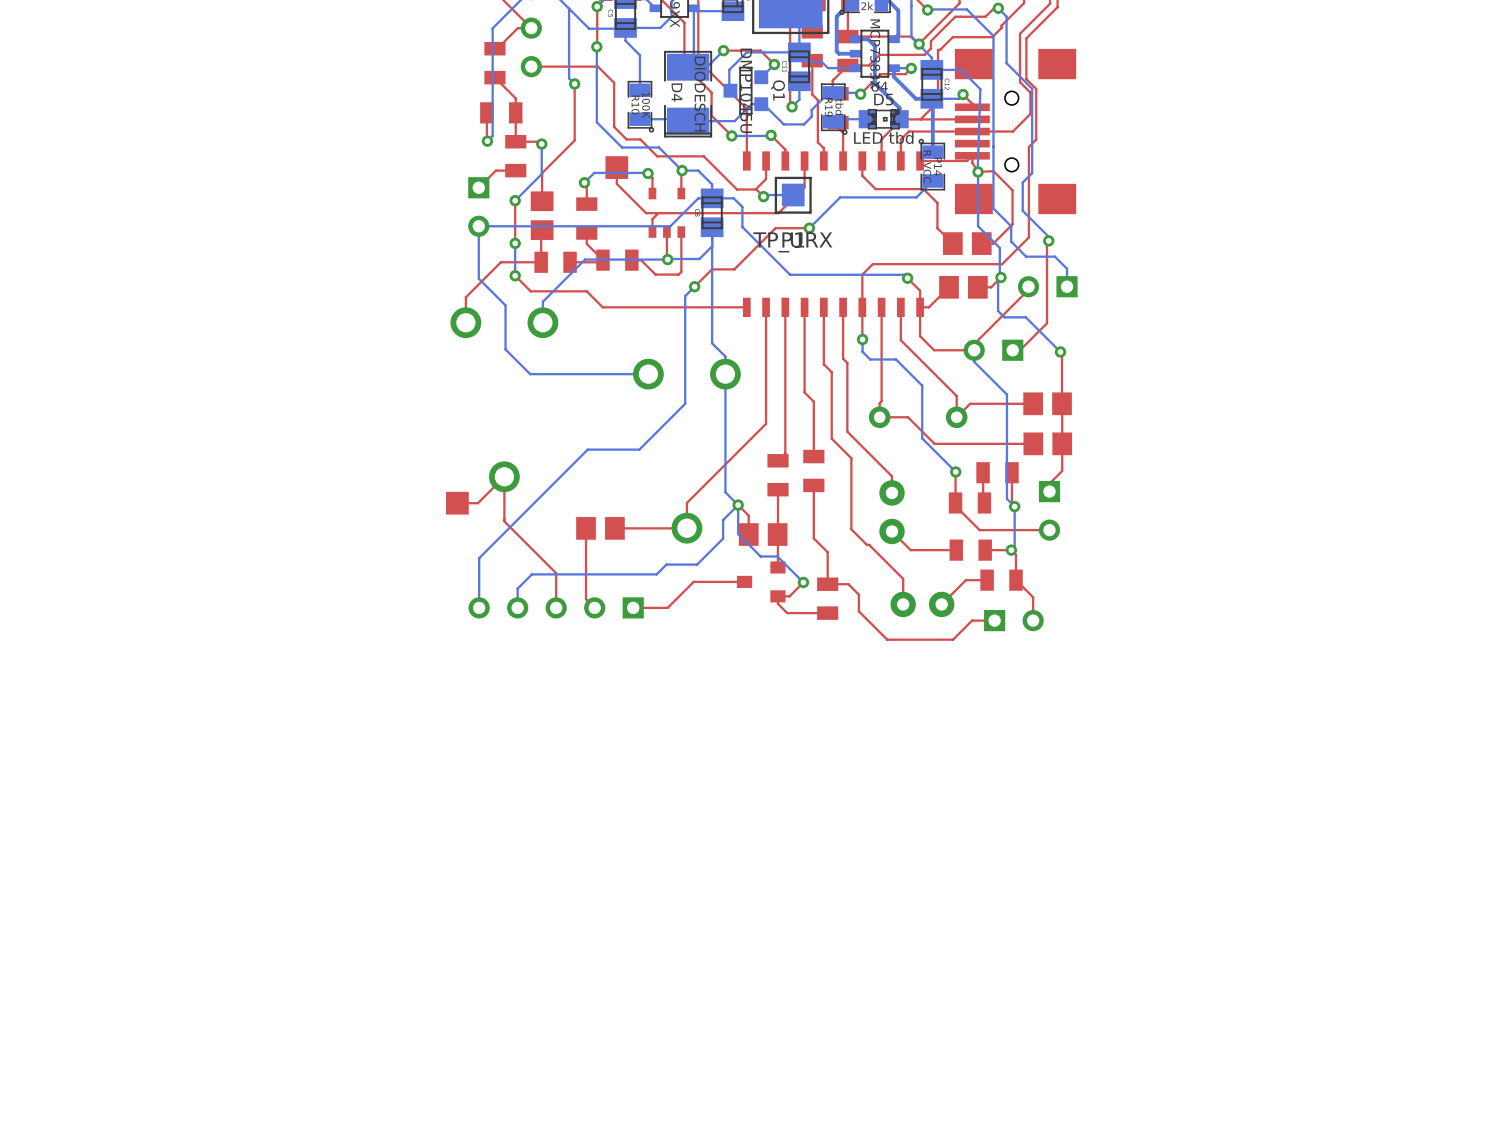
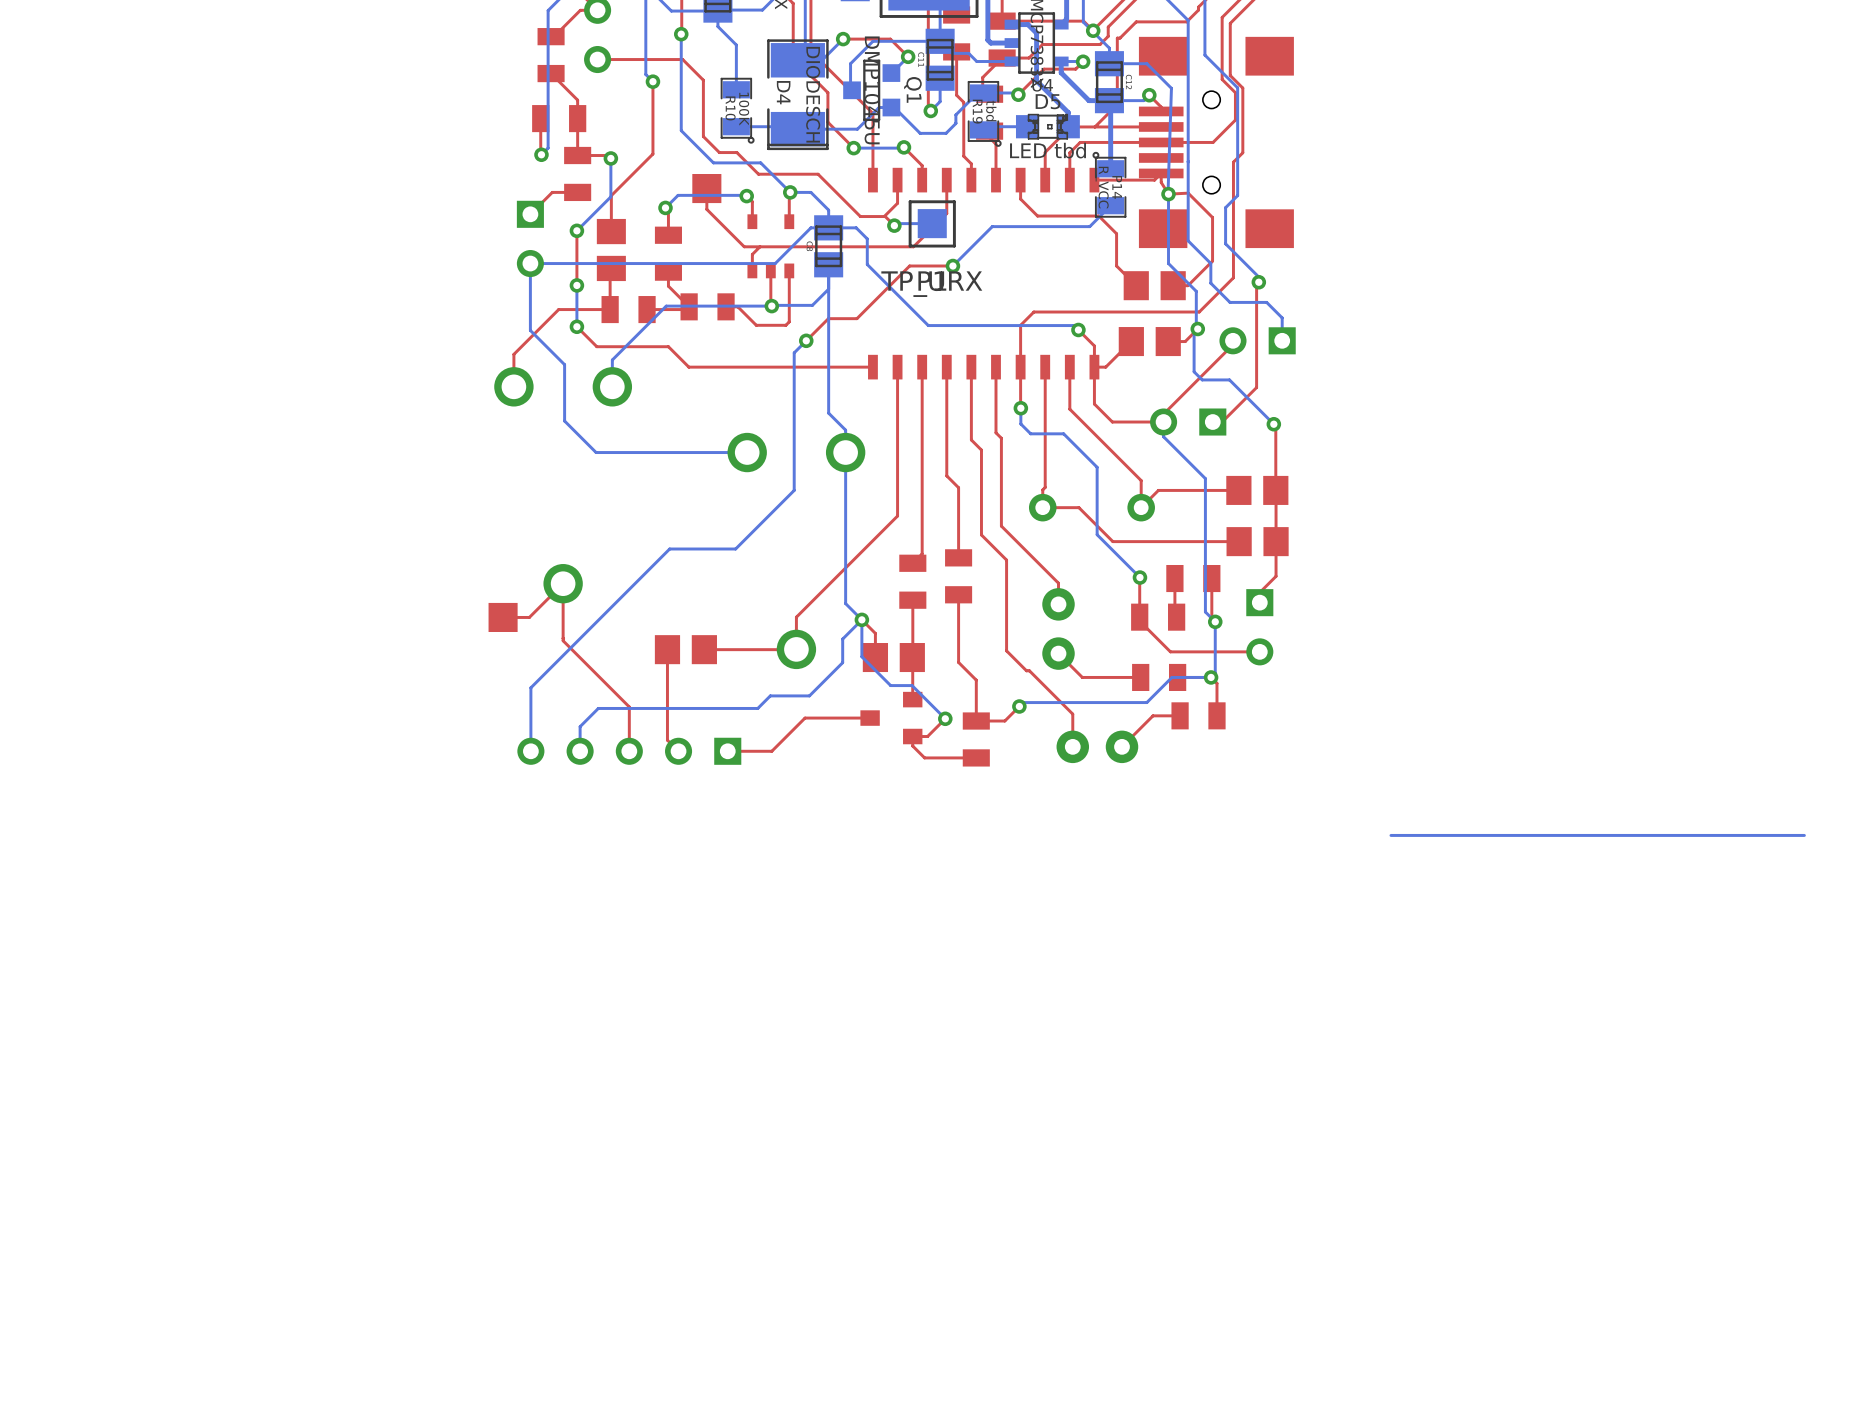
bottom track: none -> (1211, 677) (1171, 677) (1146, 702) (1023, 702) (1019, 706)
via: none -> (1019, 706)
top track: (1016, 580) (1033, 597) (1033, 620) -> none
top track: (848, 584) (858, 594) (858, 611) (887, 639) (953, 639) (972, 620) (994, 620) -> (1002, 721) (1019, 706)
part: (1013, 620) -> none
bottom track: none -> (1804, 835) (1390, 835)

